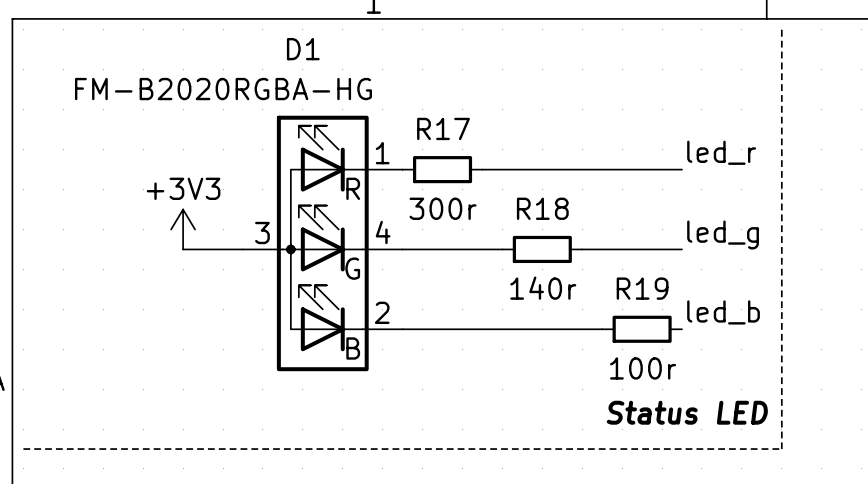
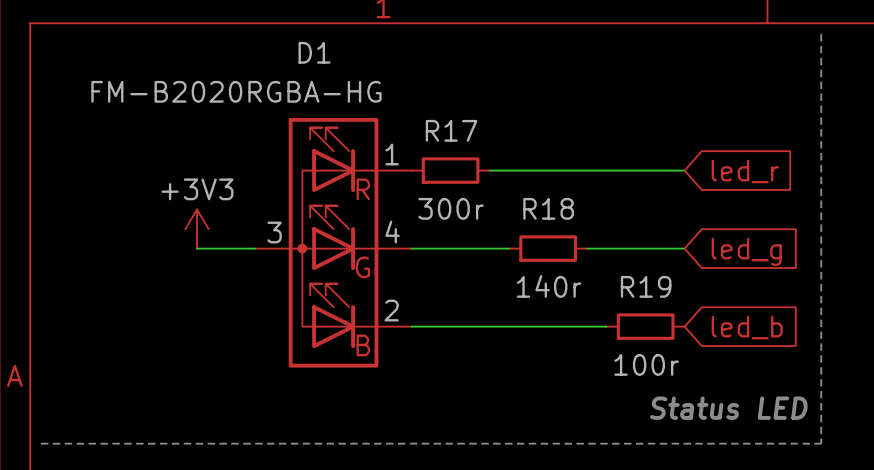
line: (781, 29) (781, 449) -> (821, 34) (821, 443) (782, 443)
label: led_r (721, 152) -> none
global label: none -> led_r (745, 171)
label: led_g (723, 234) -> none
global label: none -> led_g (746, 251)
label: led_b (723, 312) -> none
global label: none -> led_b (747, 327)
text position: Status LED (687, 412) -> Status LED (728, 408)

